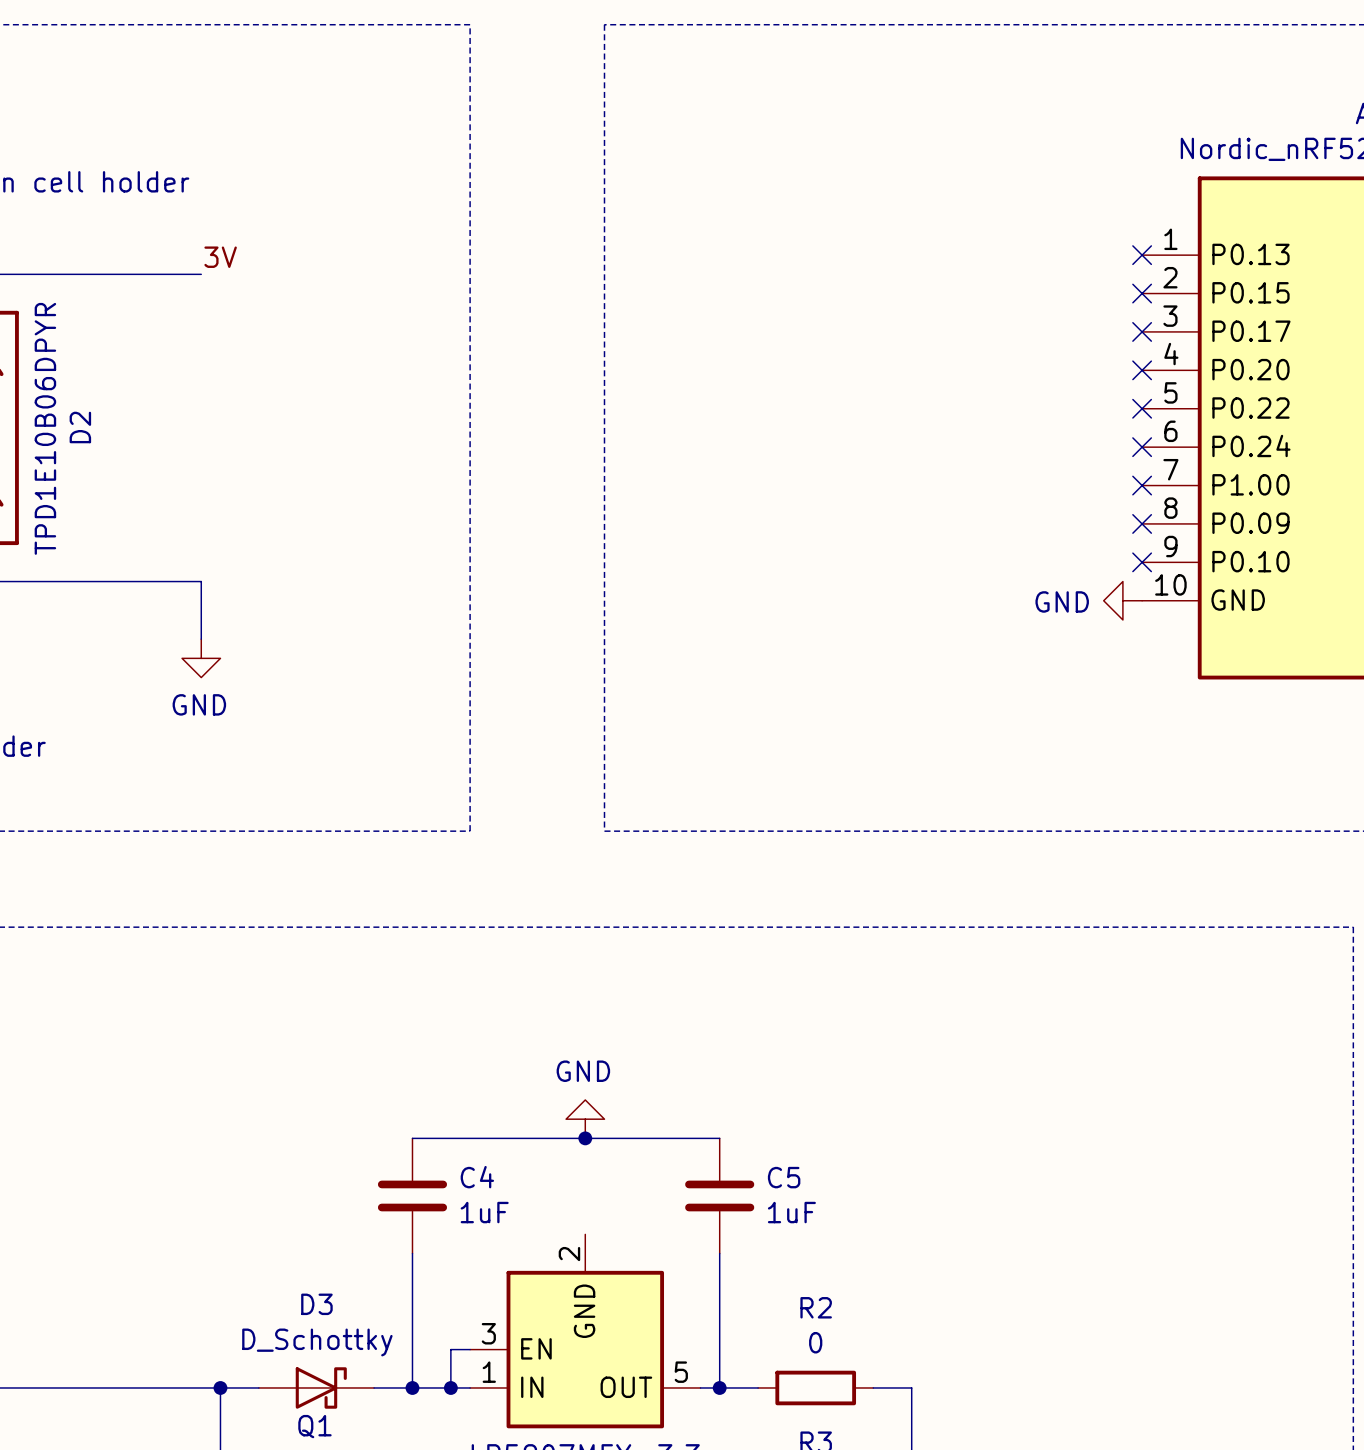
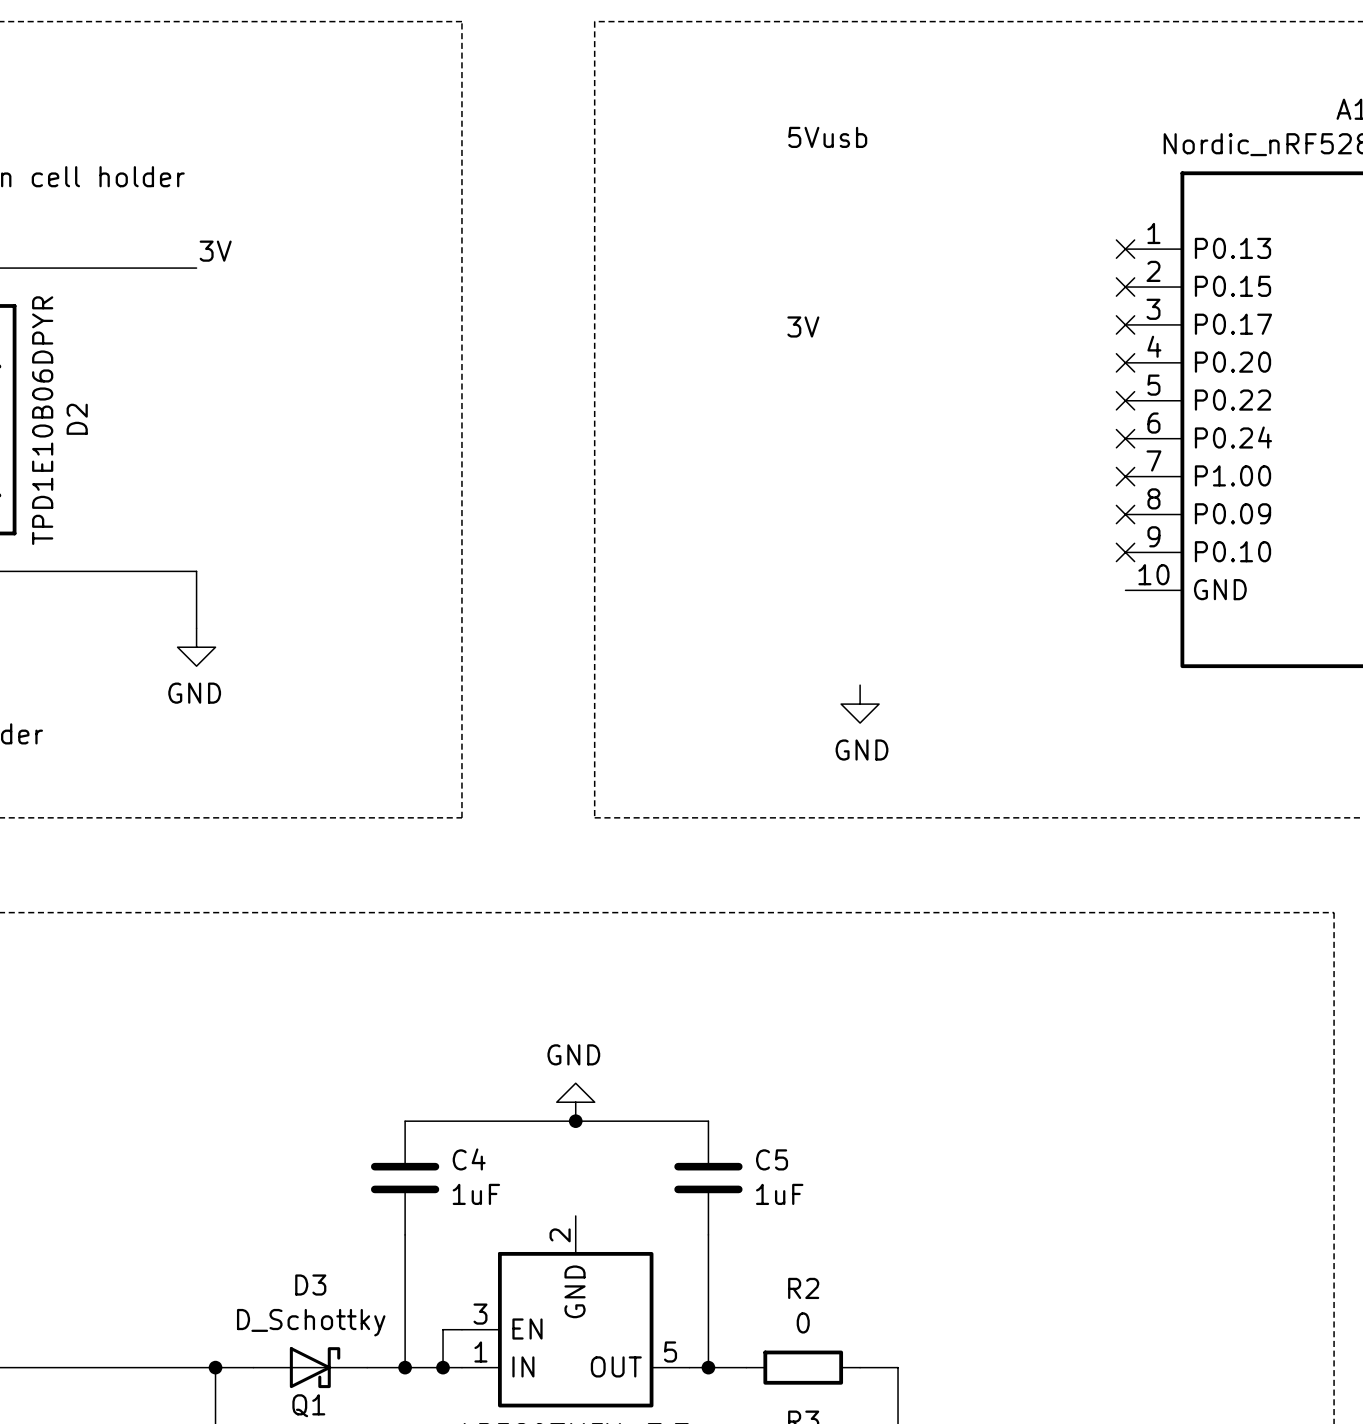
label: none -> 5Vusb (827, 137)
label: none -> 3V (803, 326)
power symbol rotation: 0° (1122, 600) -> 90° counterclockwise (860, 704)
power symbol position: GND (1122, 600) -> GND (860, 704)

